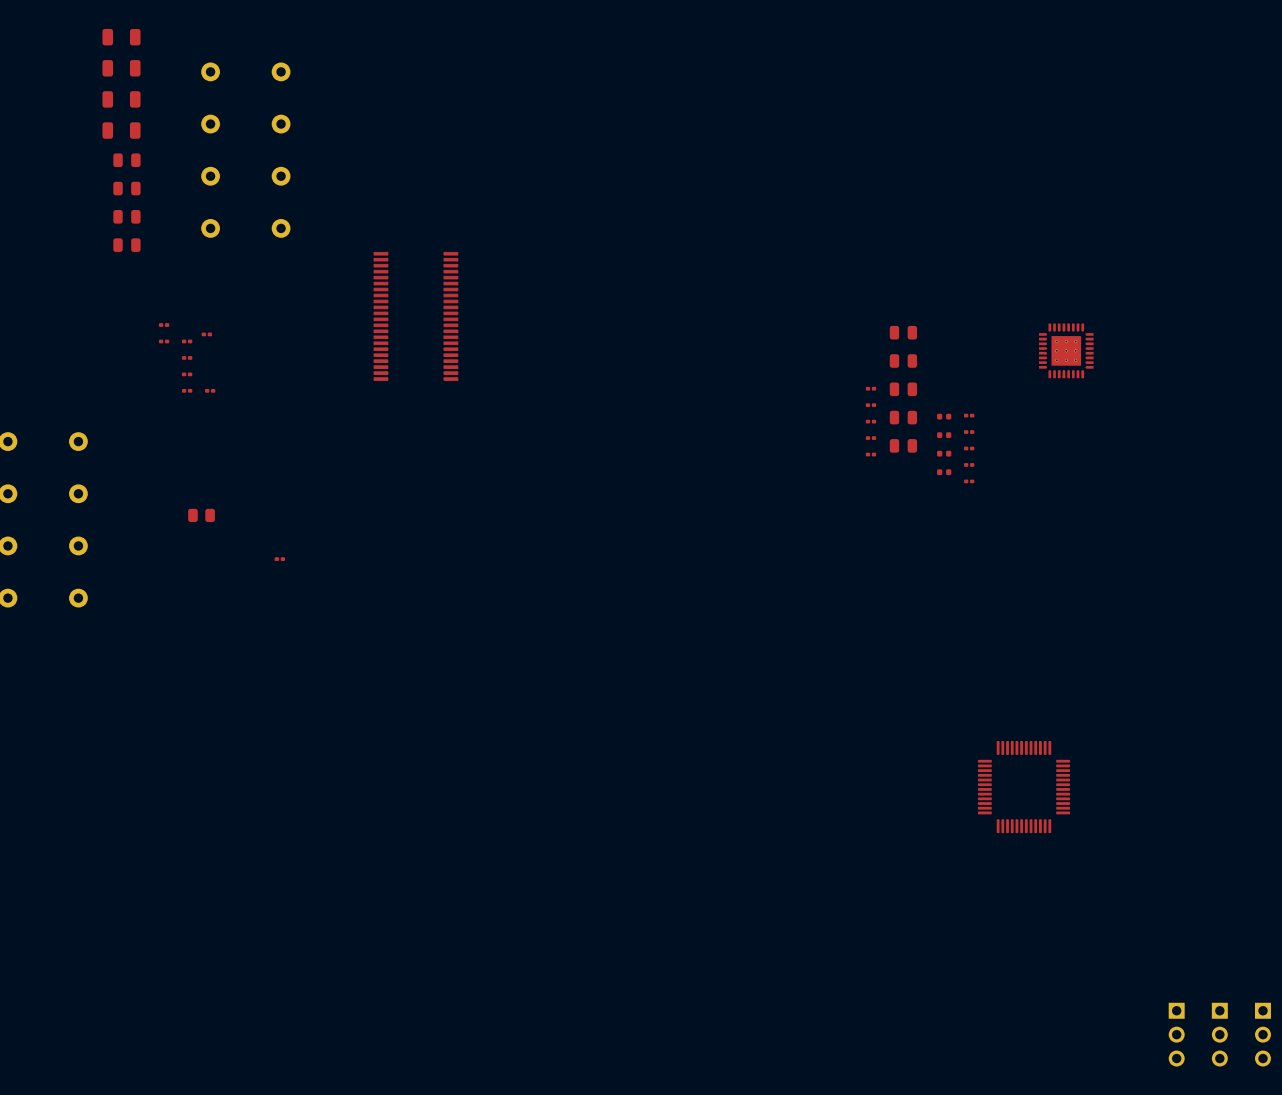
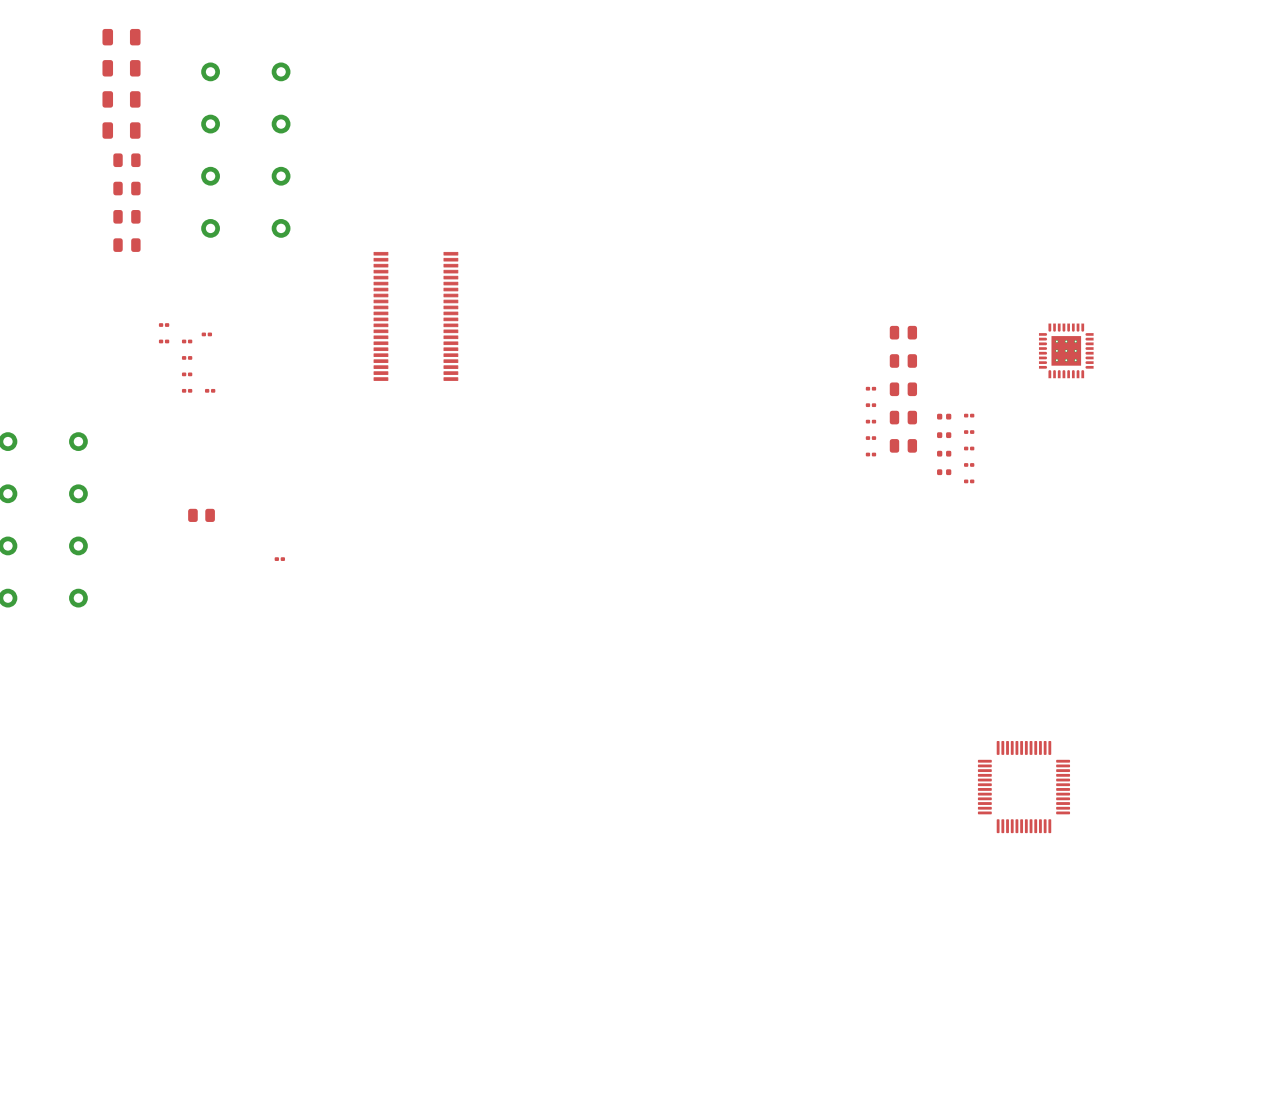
part: (1176, 1034) -> none
part: (1219, 1034) -> none
part: (1262, 1034) -> none

